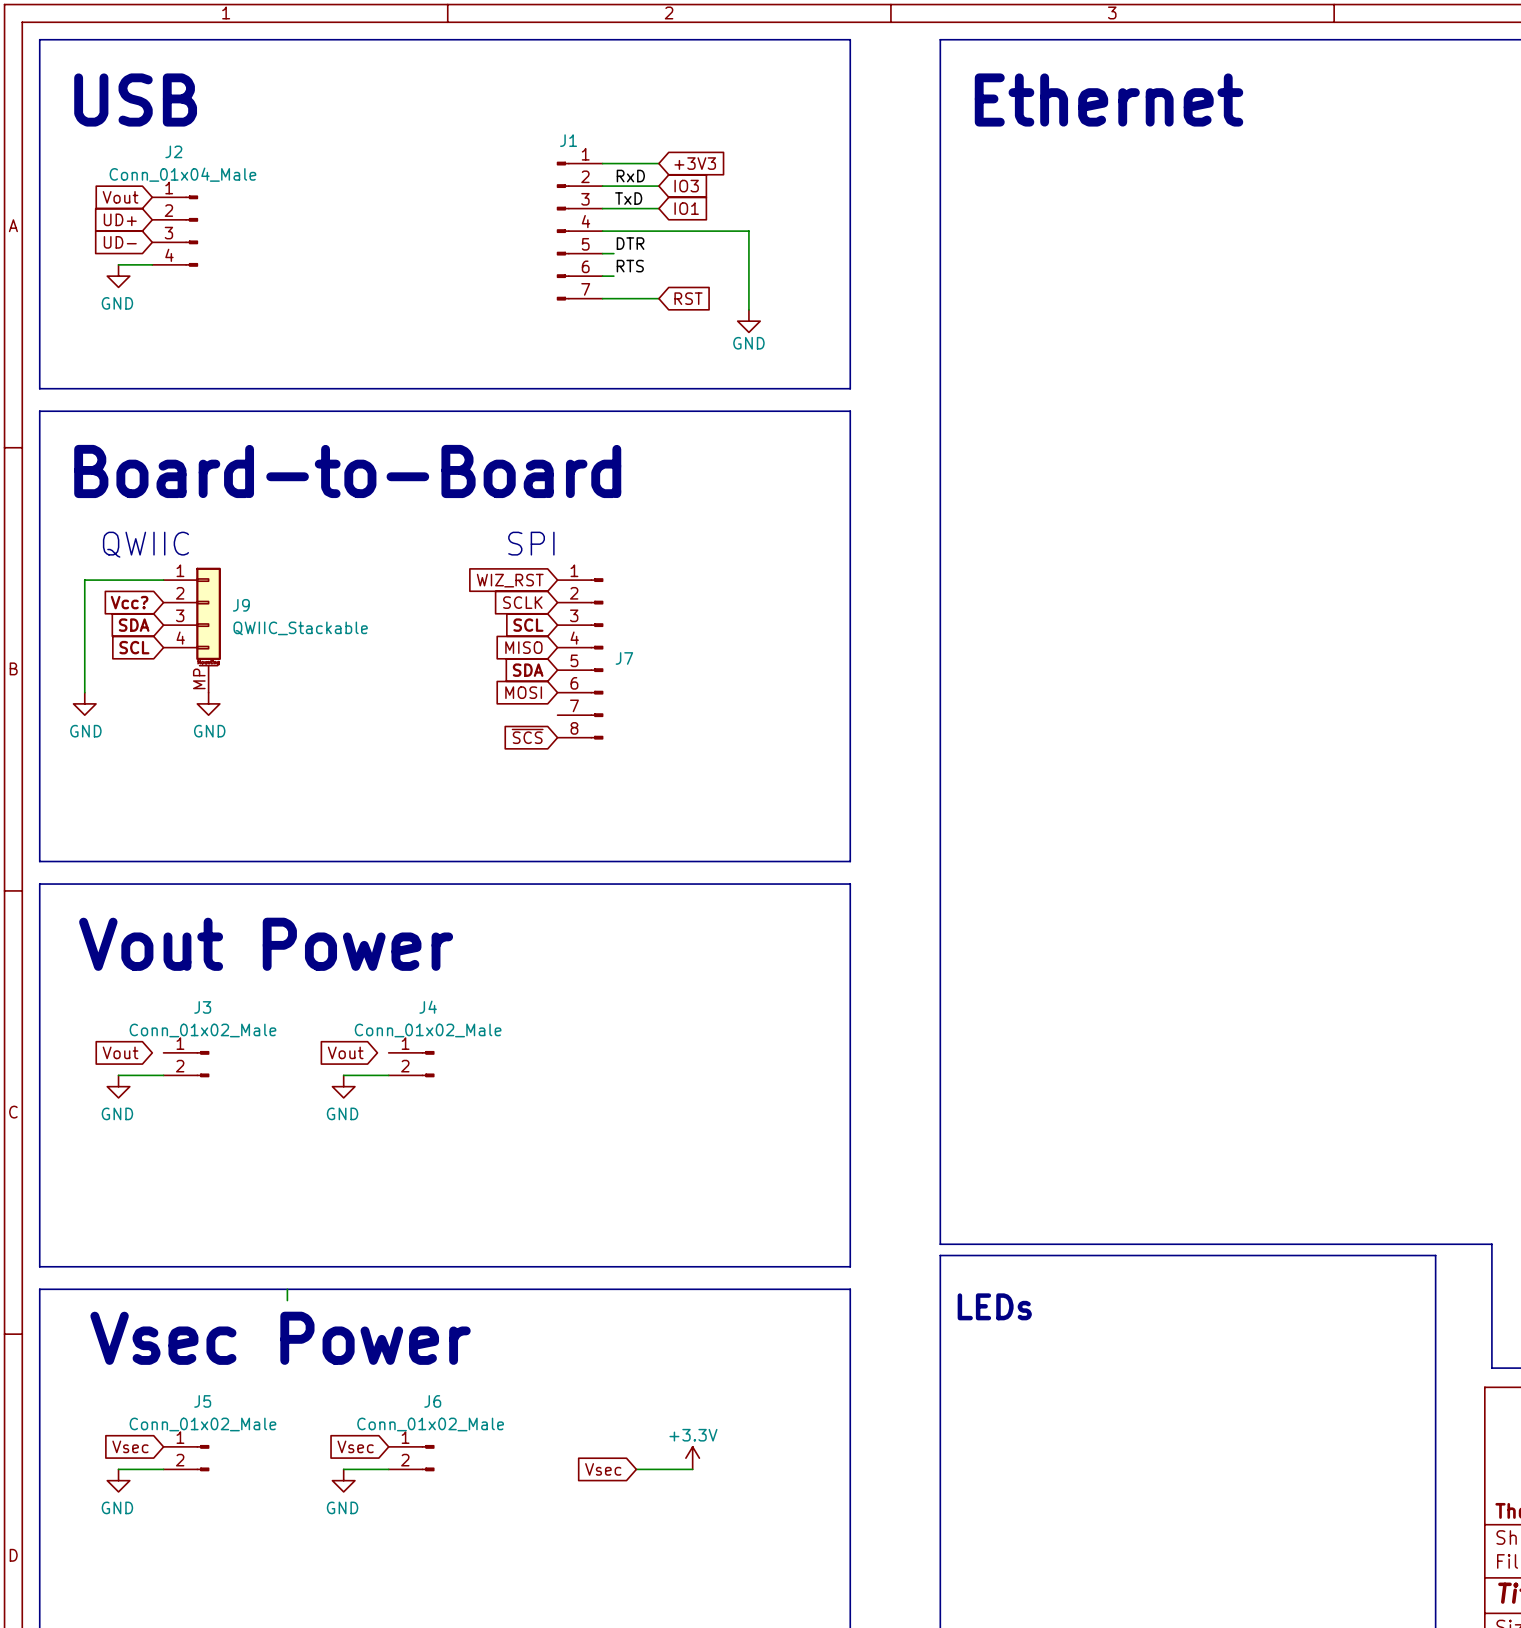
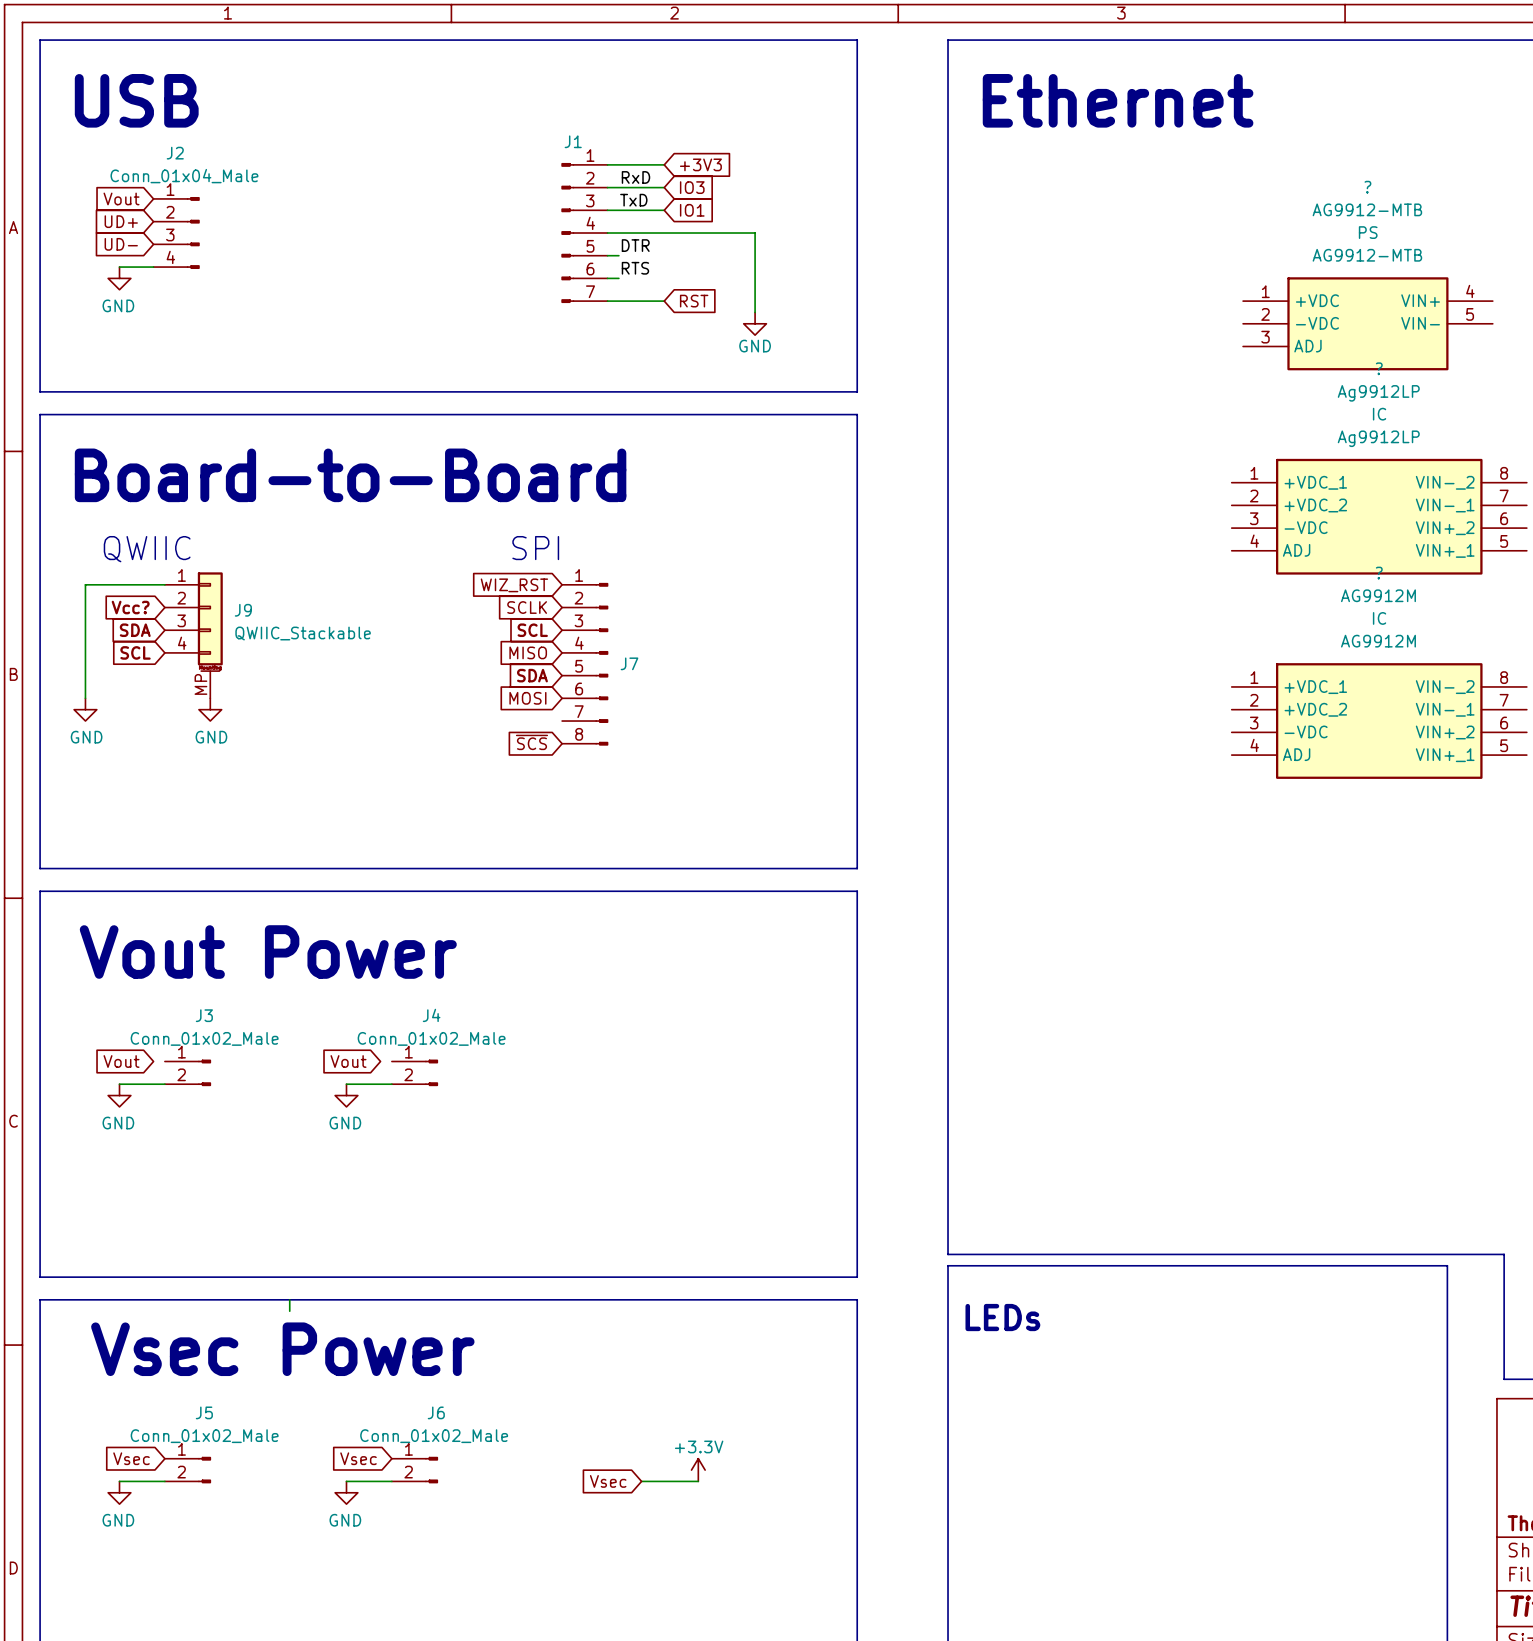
part: none -> AG9912-MTB (1367, 323)
part: none -> Ag9912LP (1379, 516)
part: none -> AG9912M (1379, 721)

